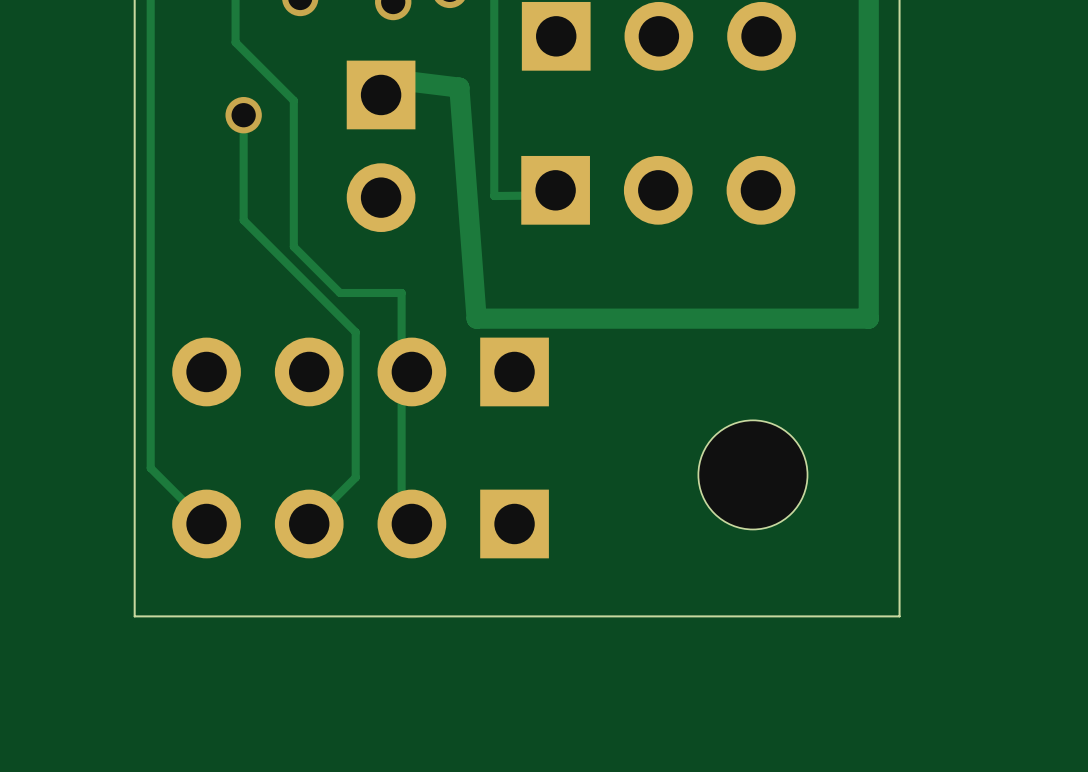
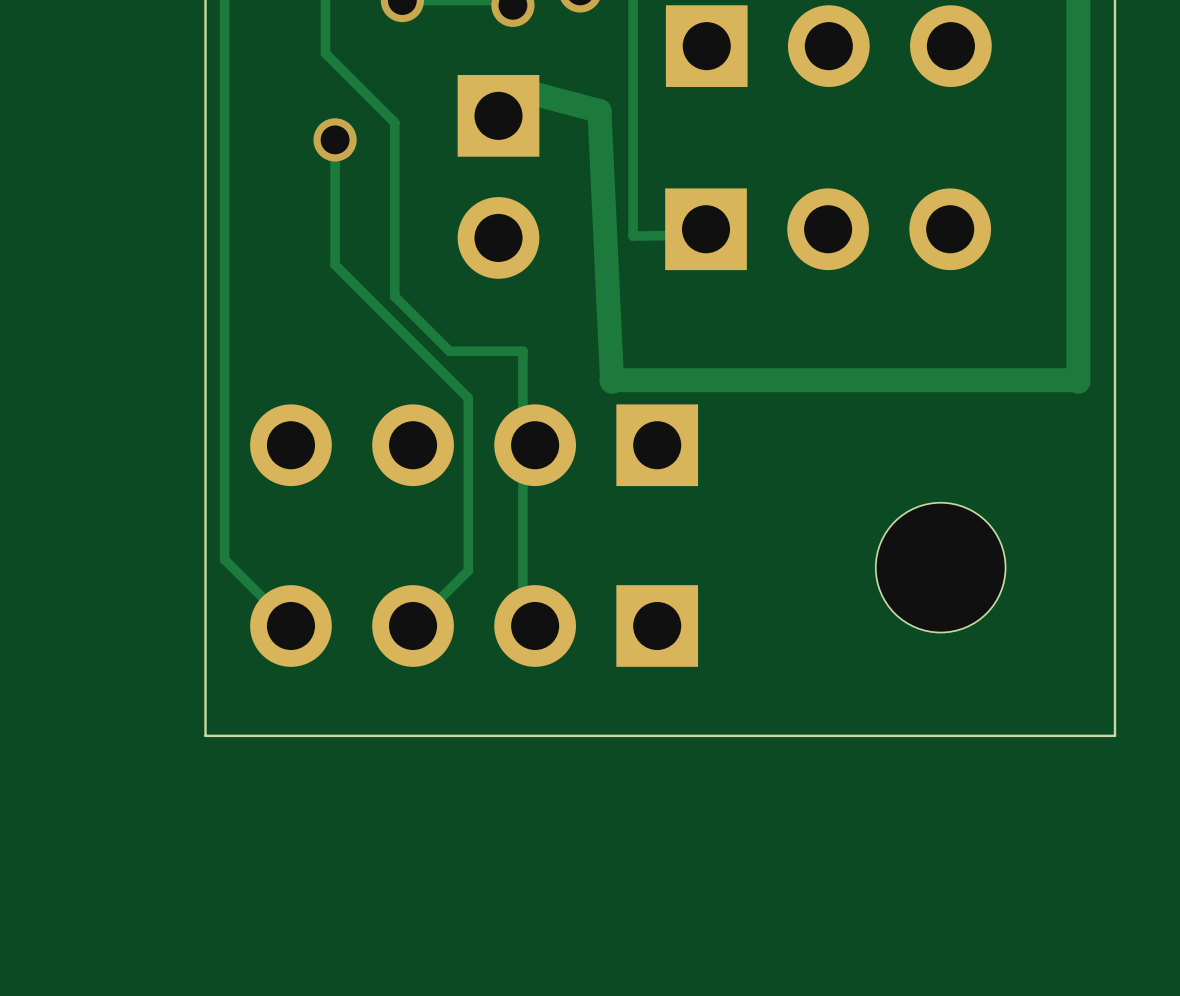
track: none -> (527, 91) (599, 111) (612, 381)
track: (375, 77) (459, 87) (476, 318) (868, 318) -> (611, 380) (1077, 380)

